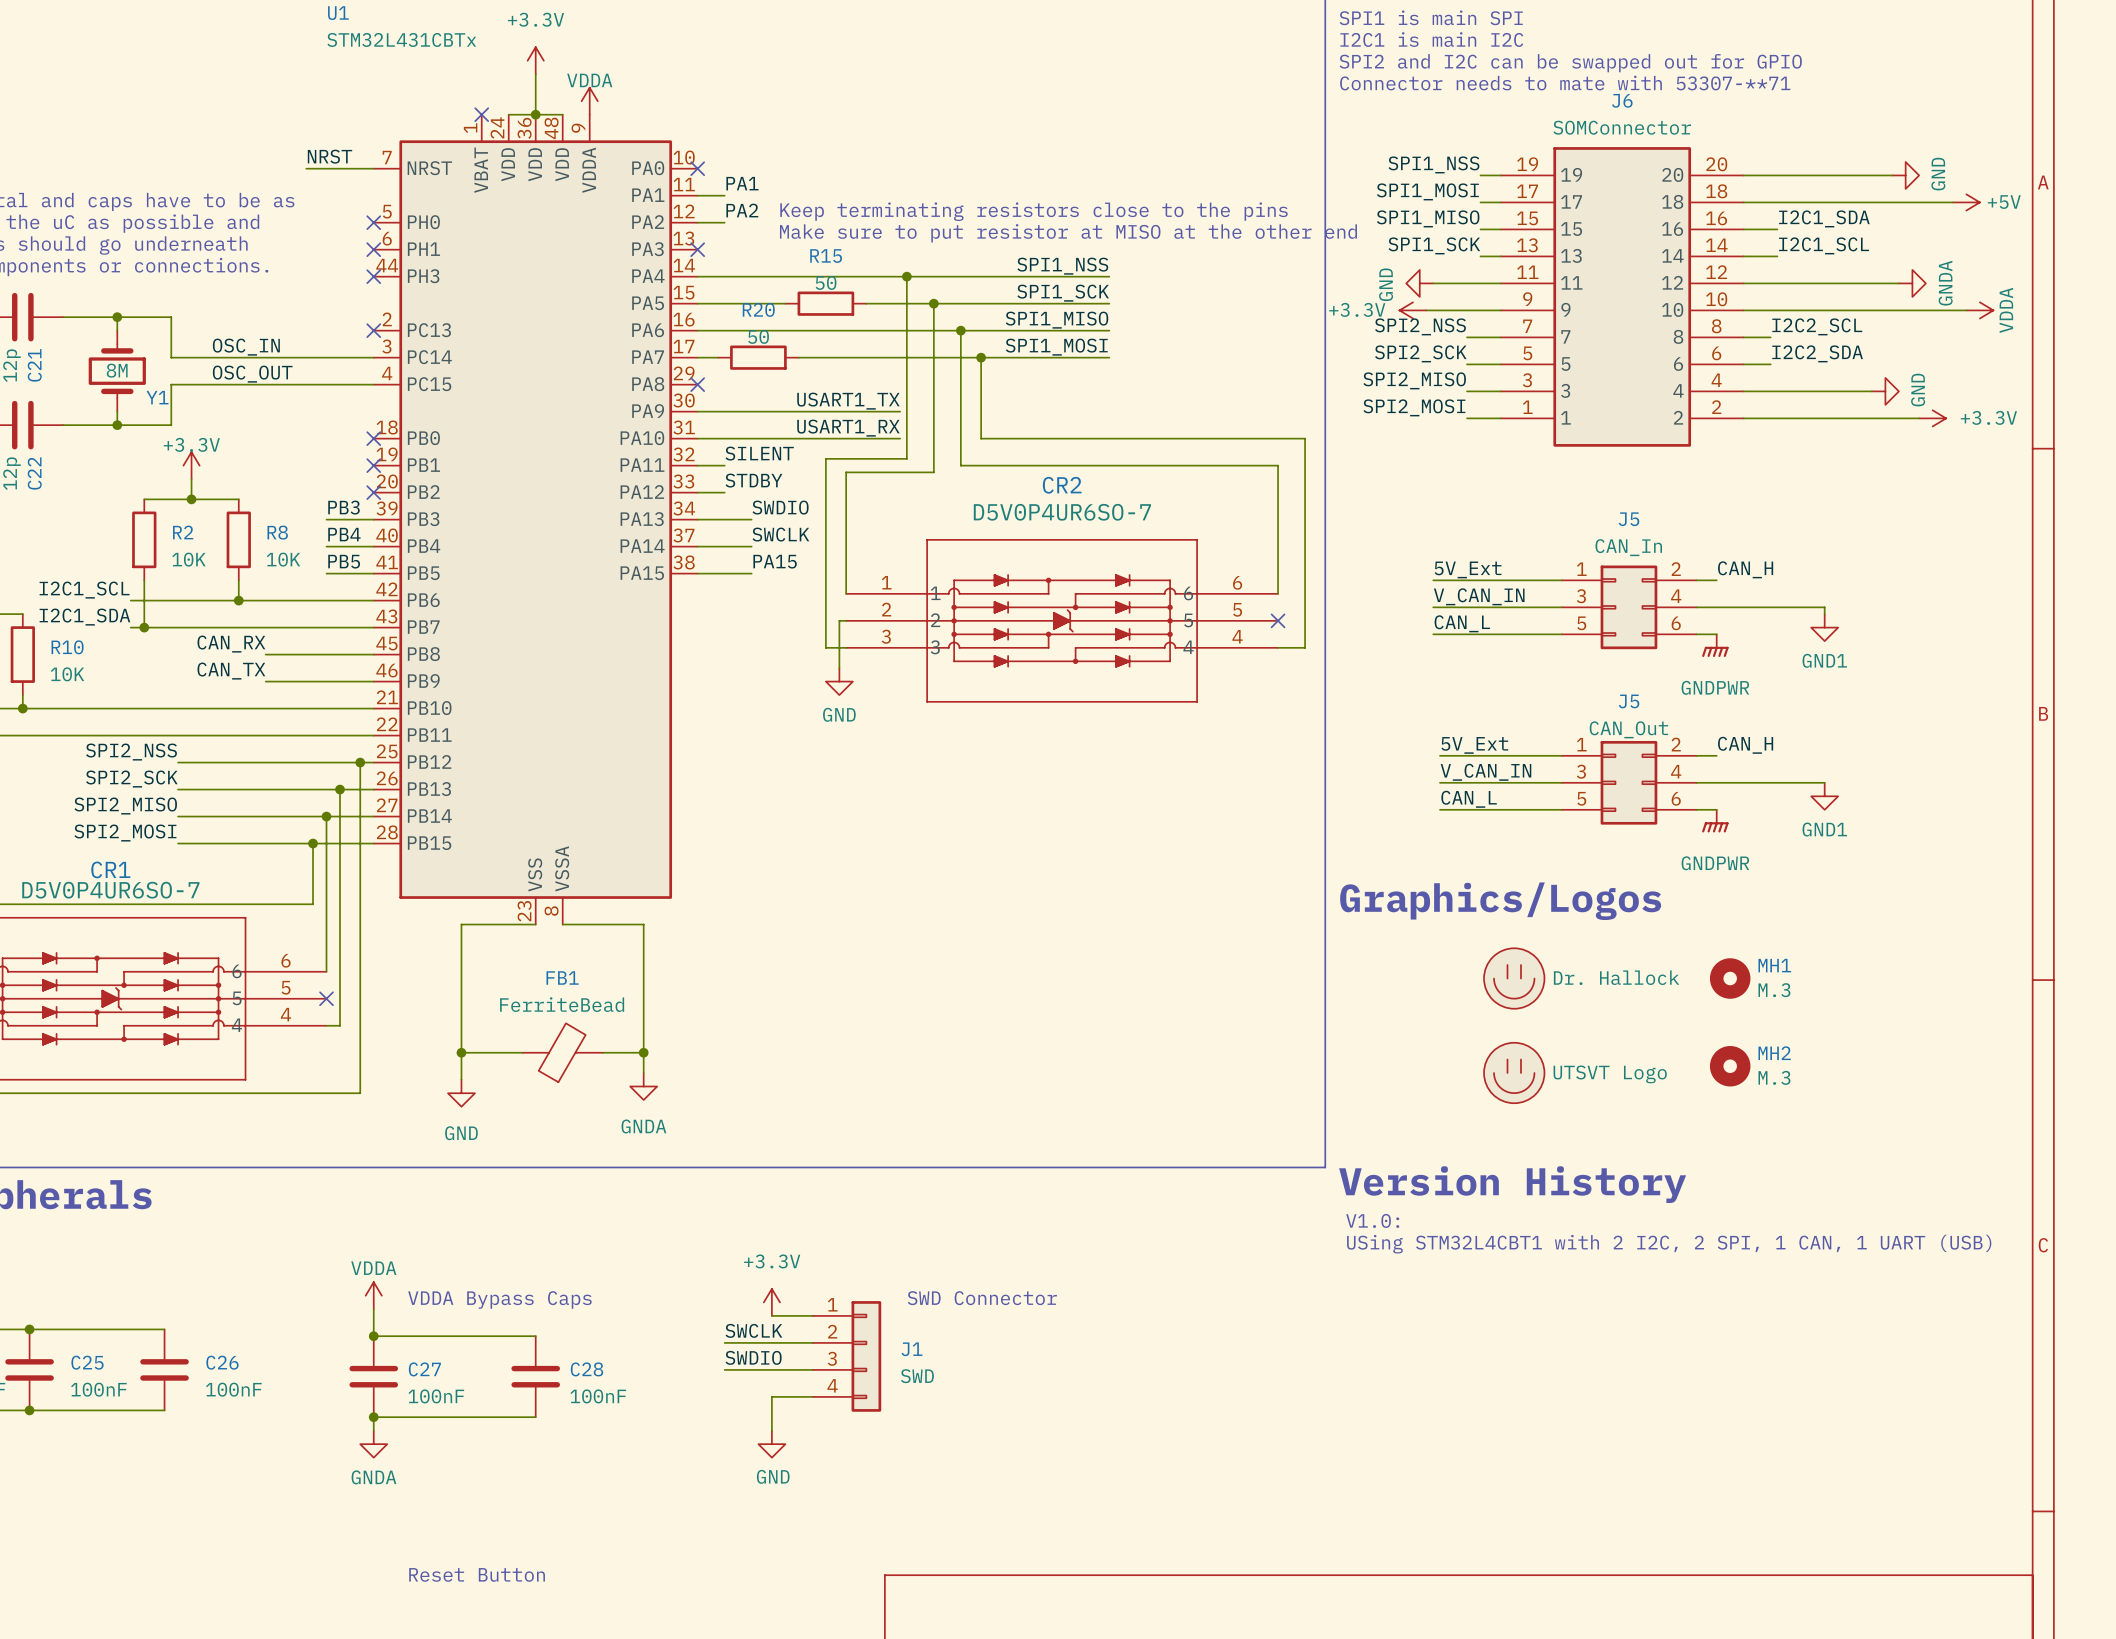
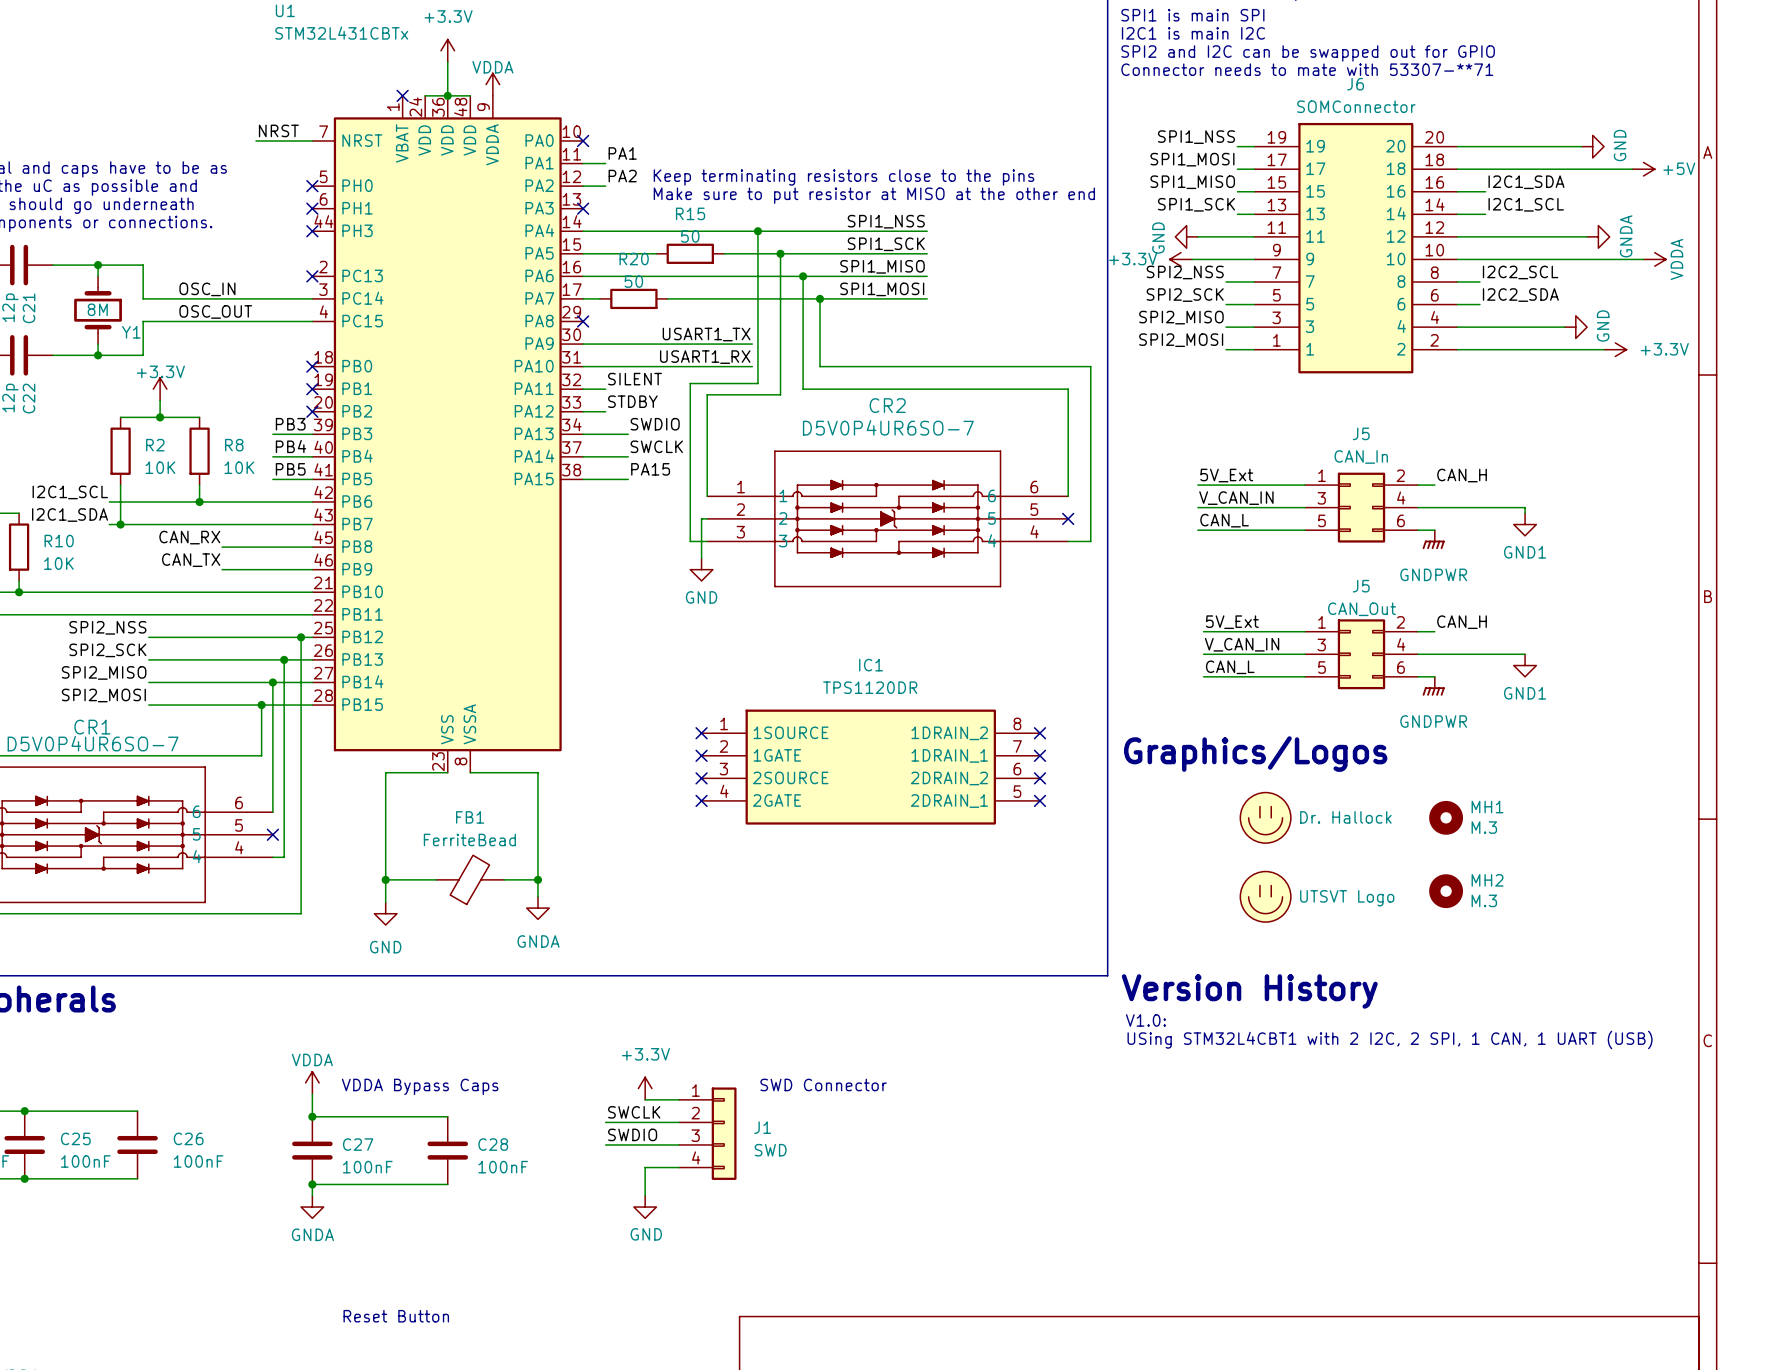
no-connect mark: none -> (701, 733)
no-connect mark: none -> (1039, 733)
no-connect mark: none -> (701, 755)
no-connect mark: none -> (1039, 755)
IC1: none -> TPS1120DR (870, 767)
no-connect mark: none -> (701, 778)
no-connect mark: none -> (1039, 778)
no-connect mark: none -> (701, 800)
no-connect mark: none -> (1039, 800)

